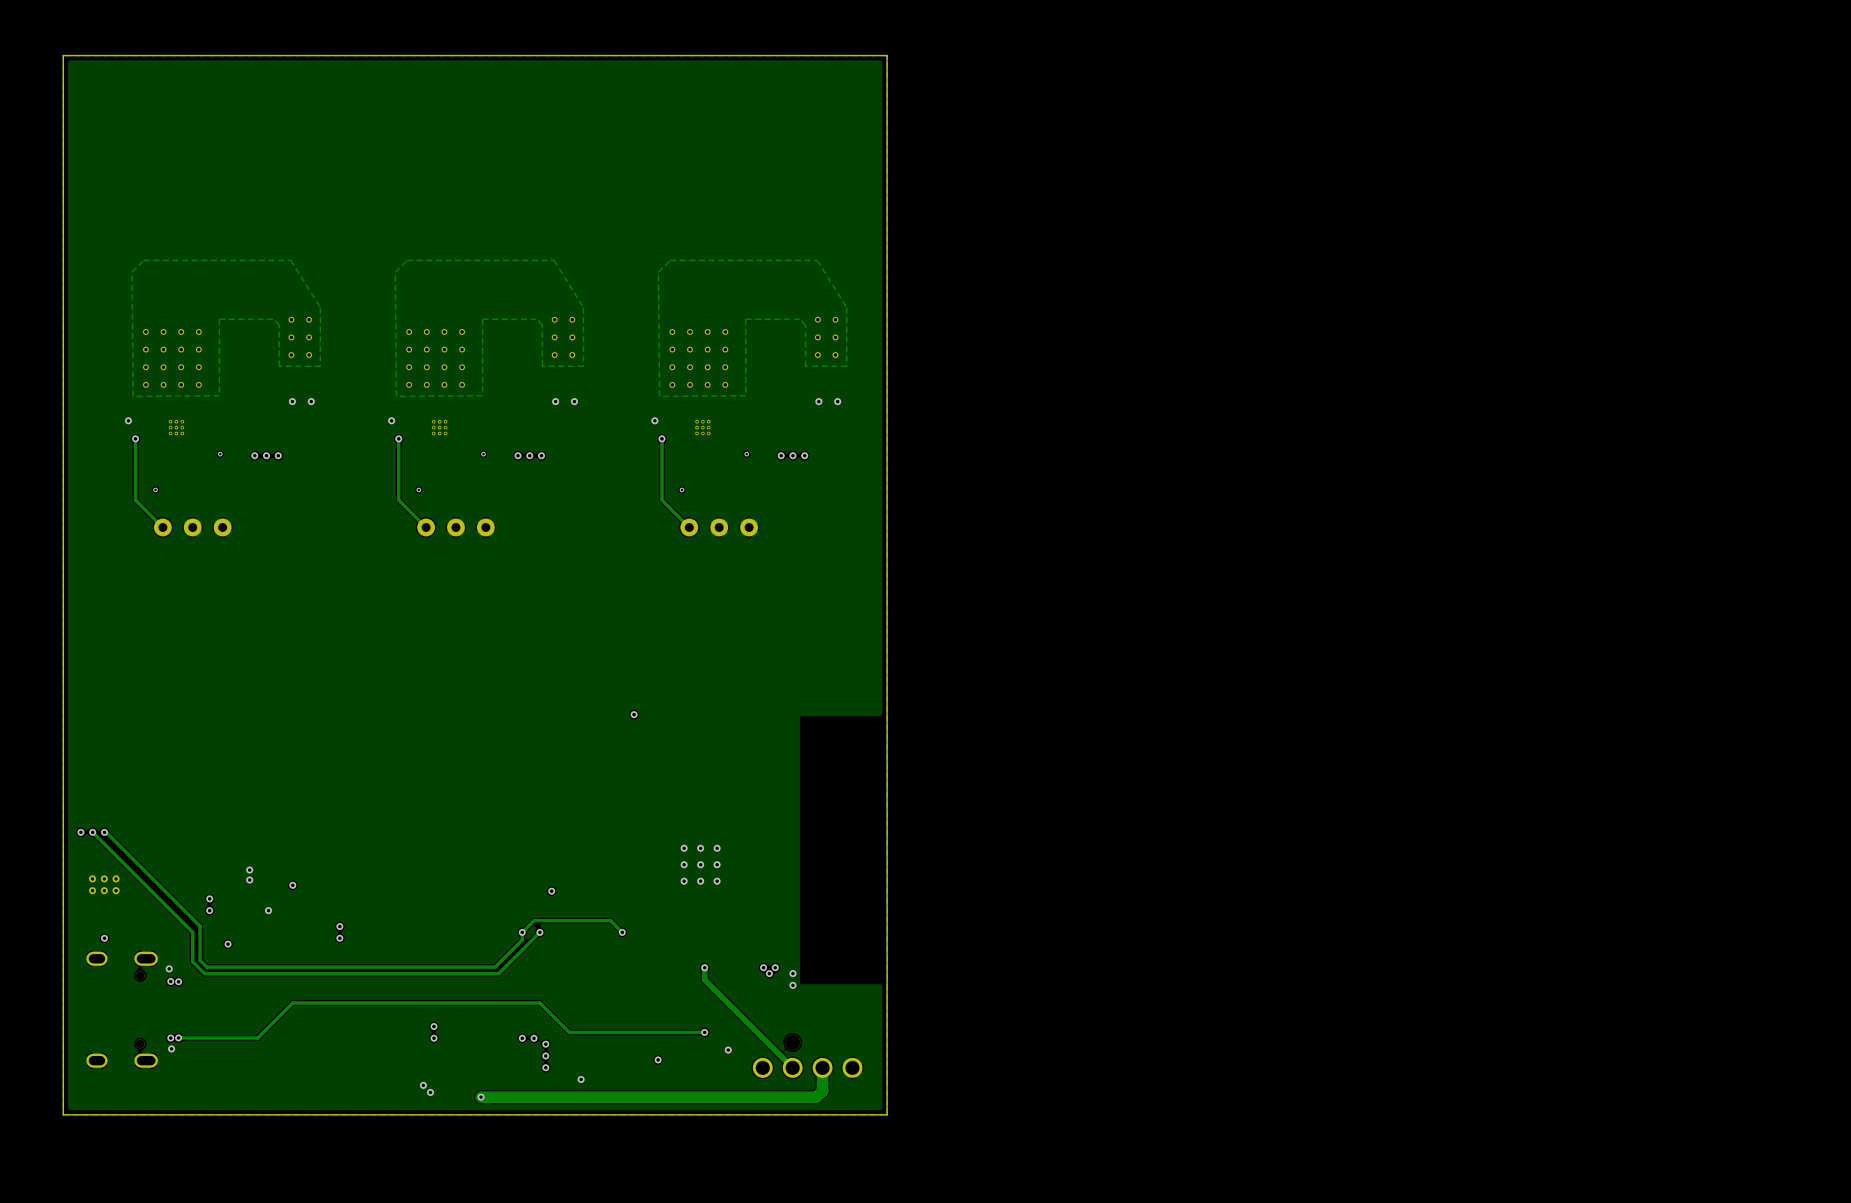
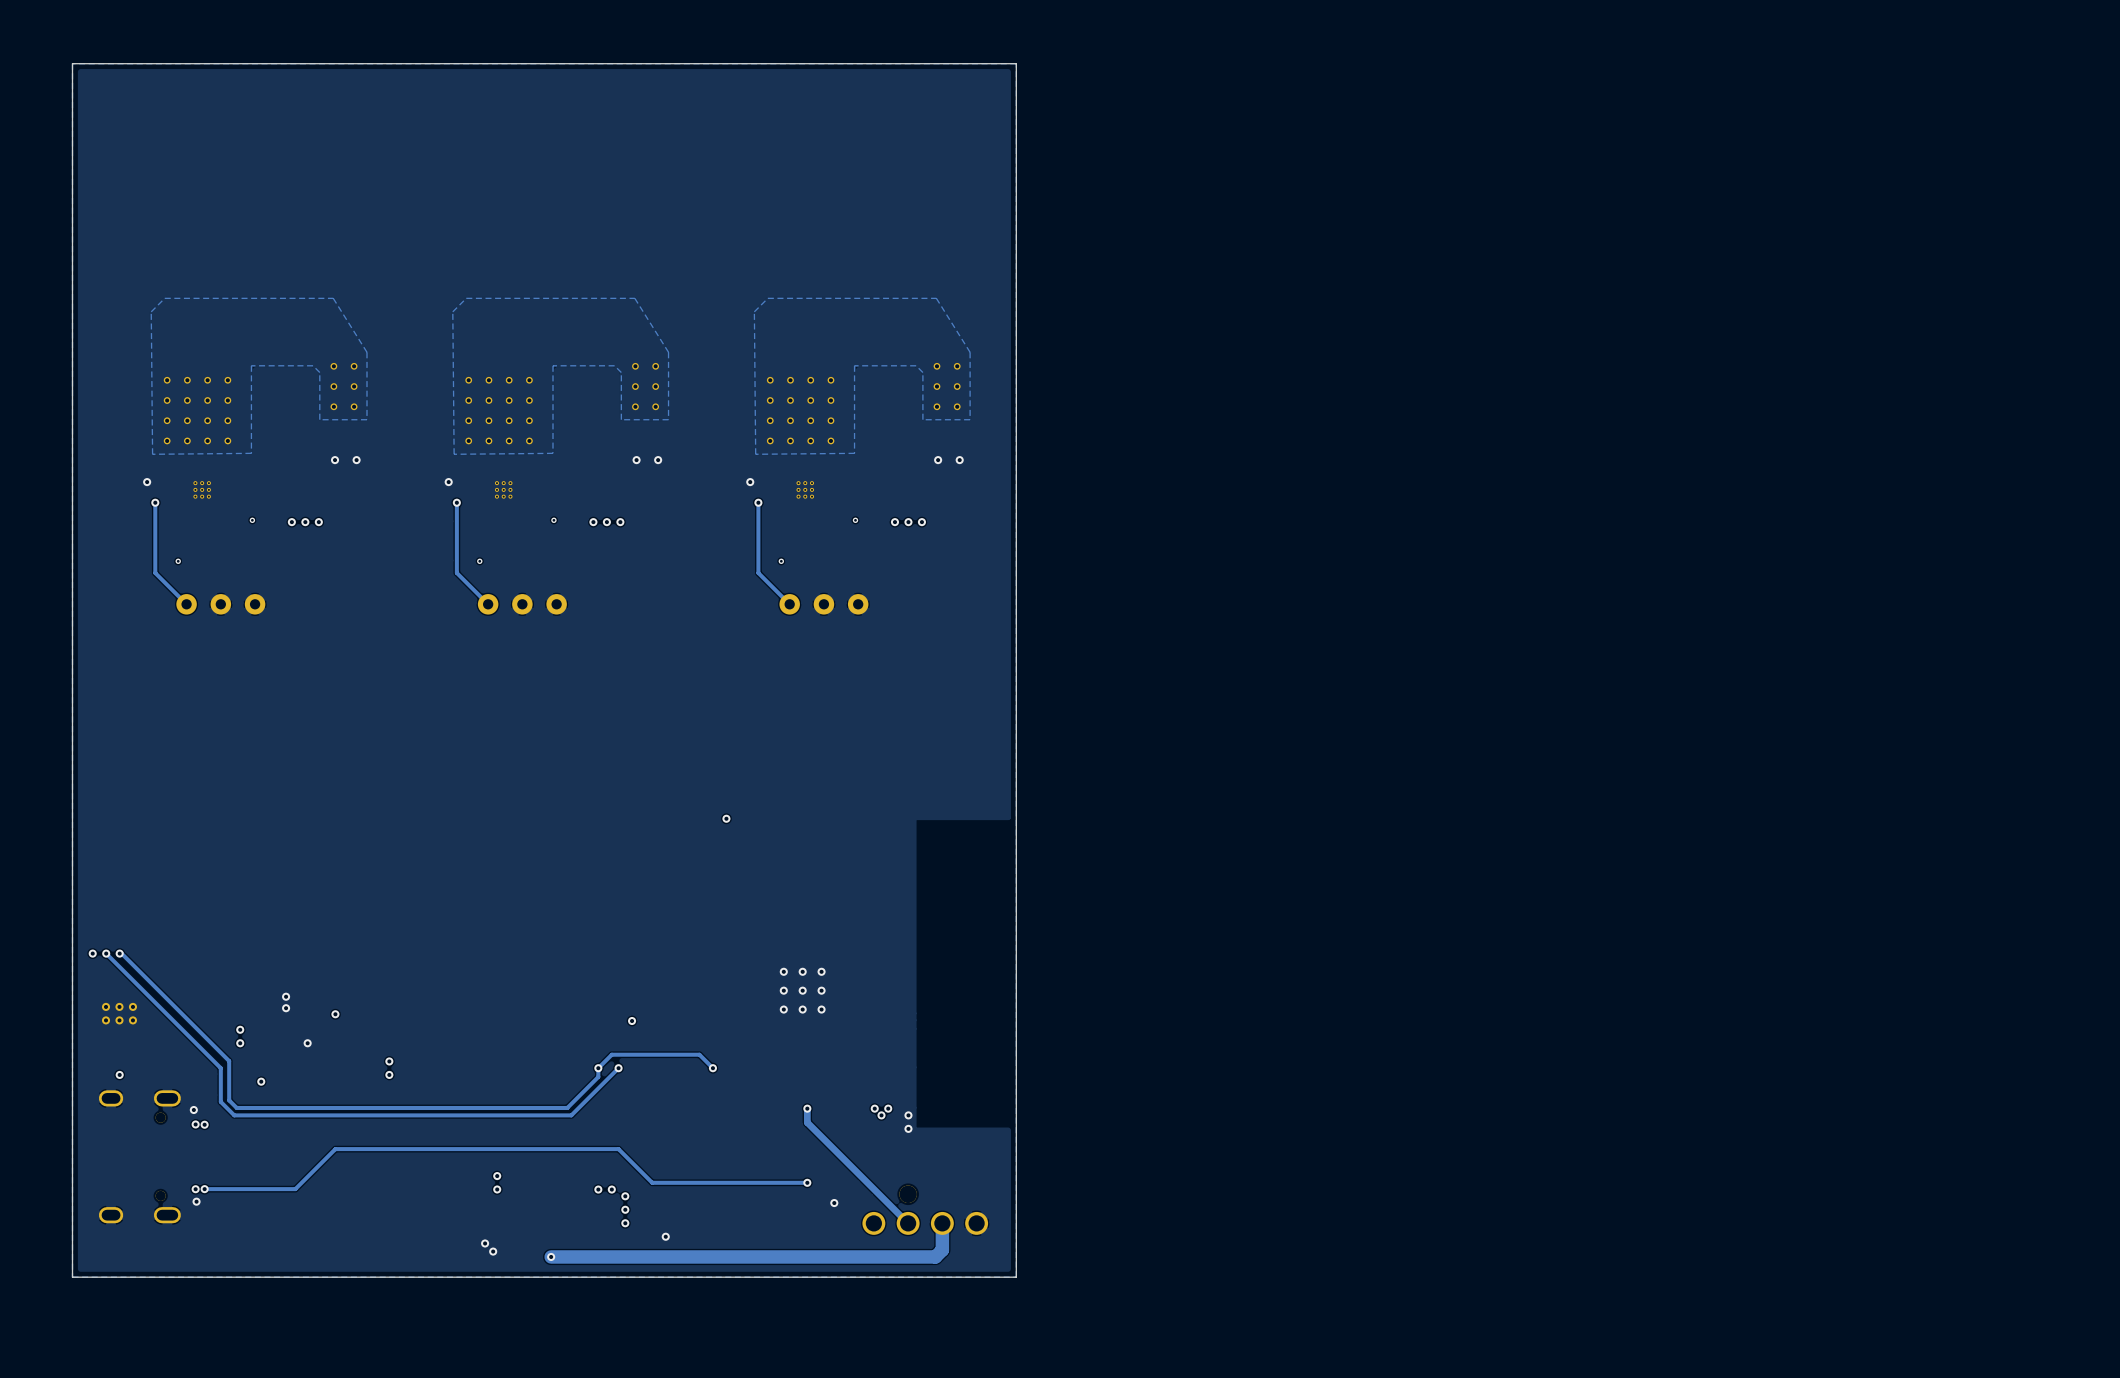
via: (658, 1059) -> none

